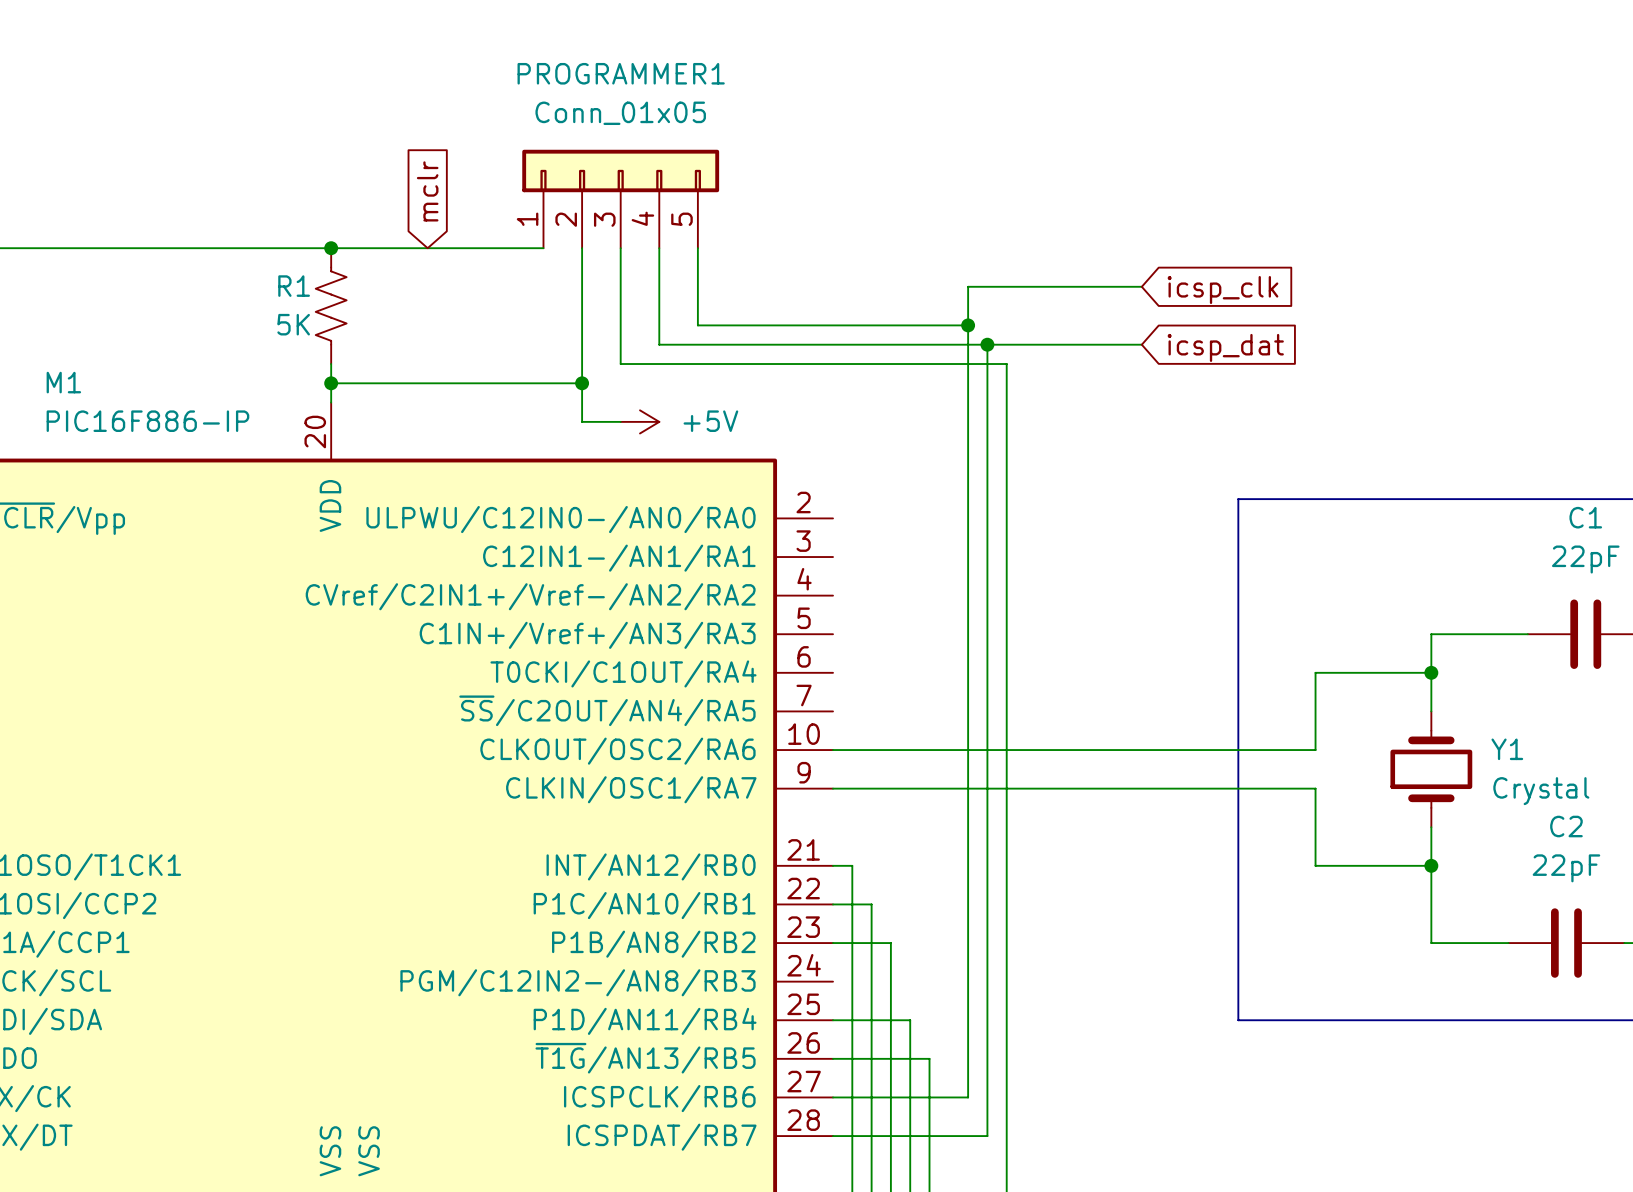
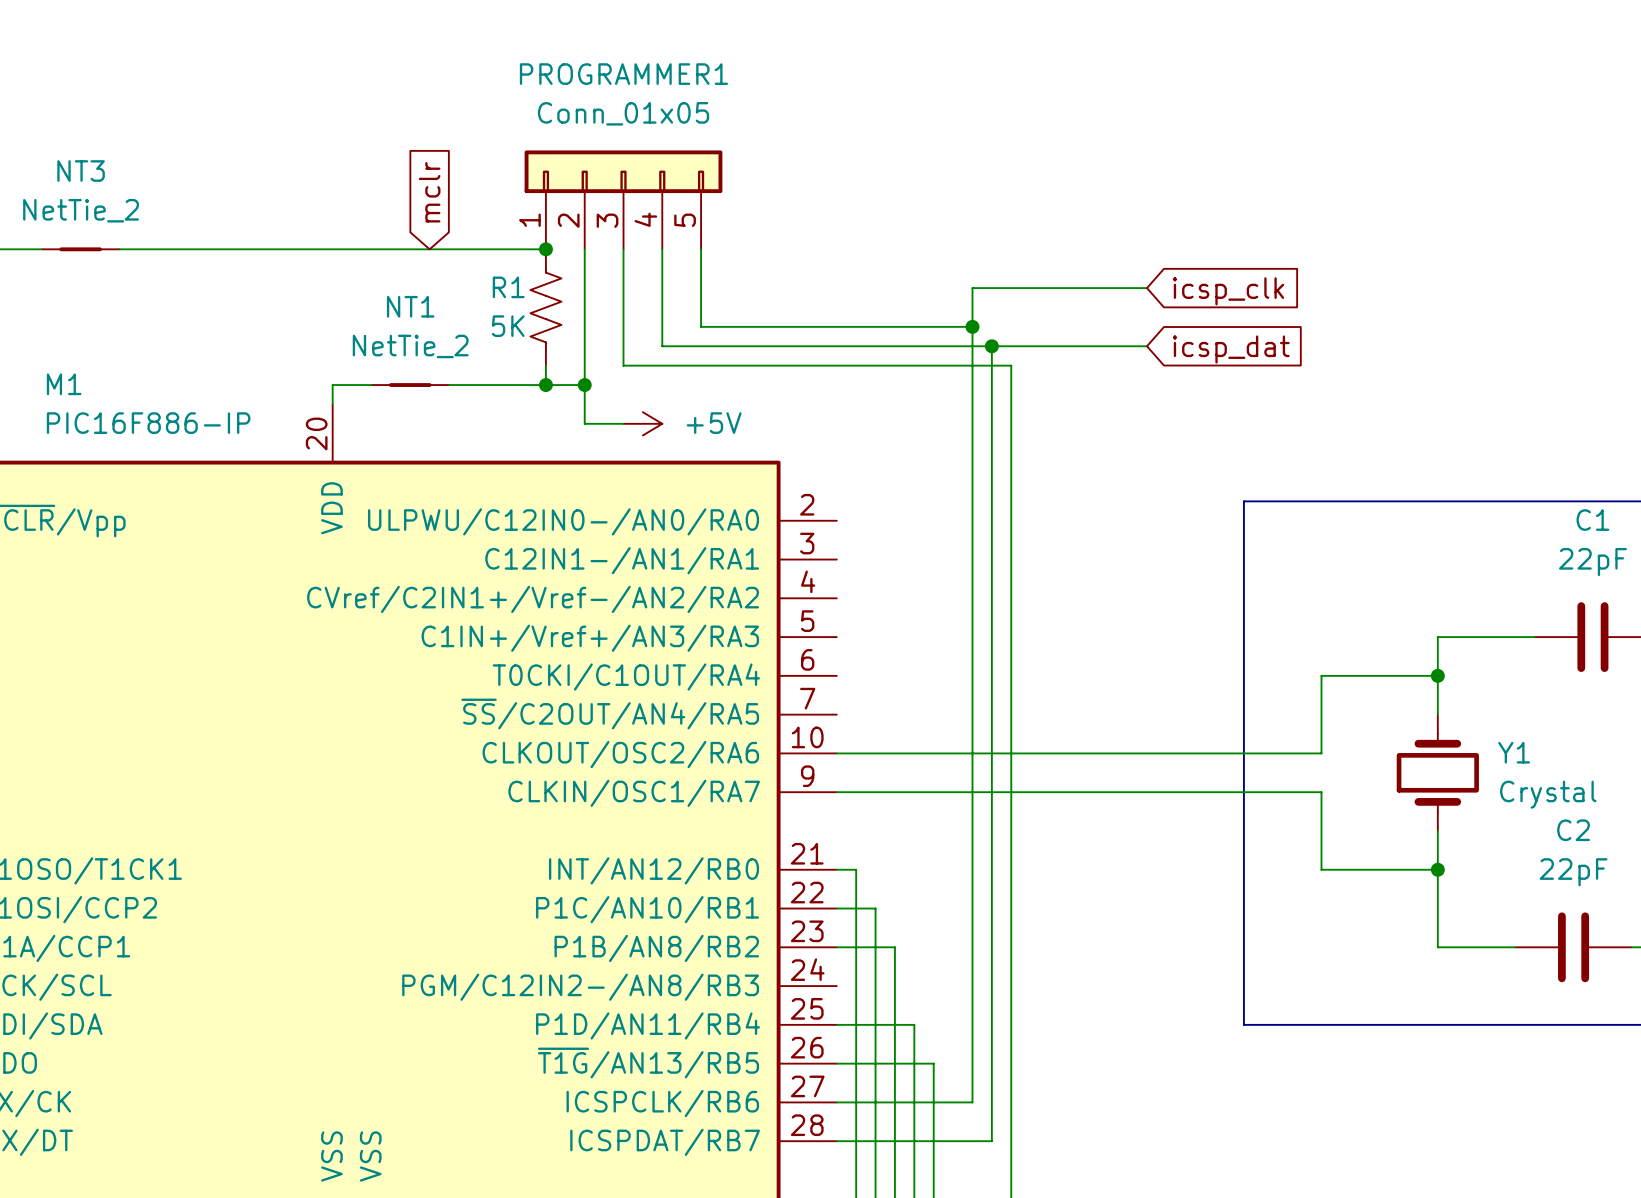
NT3: none -> NetTie_2 (80, 249)
junction: (331, 248) -> none
junction: none -> (545, 249)
R1 position: (331, 306) -> (545, 307)
wire: (331, 364) (331, 383) -> (545, 365) (545, 385)
junction: (331, 383) -> none
NT1: none -> NetTie_2 (410, 385)
junction: none -> (545, 385)

